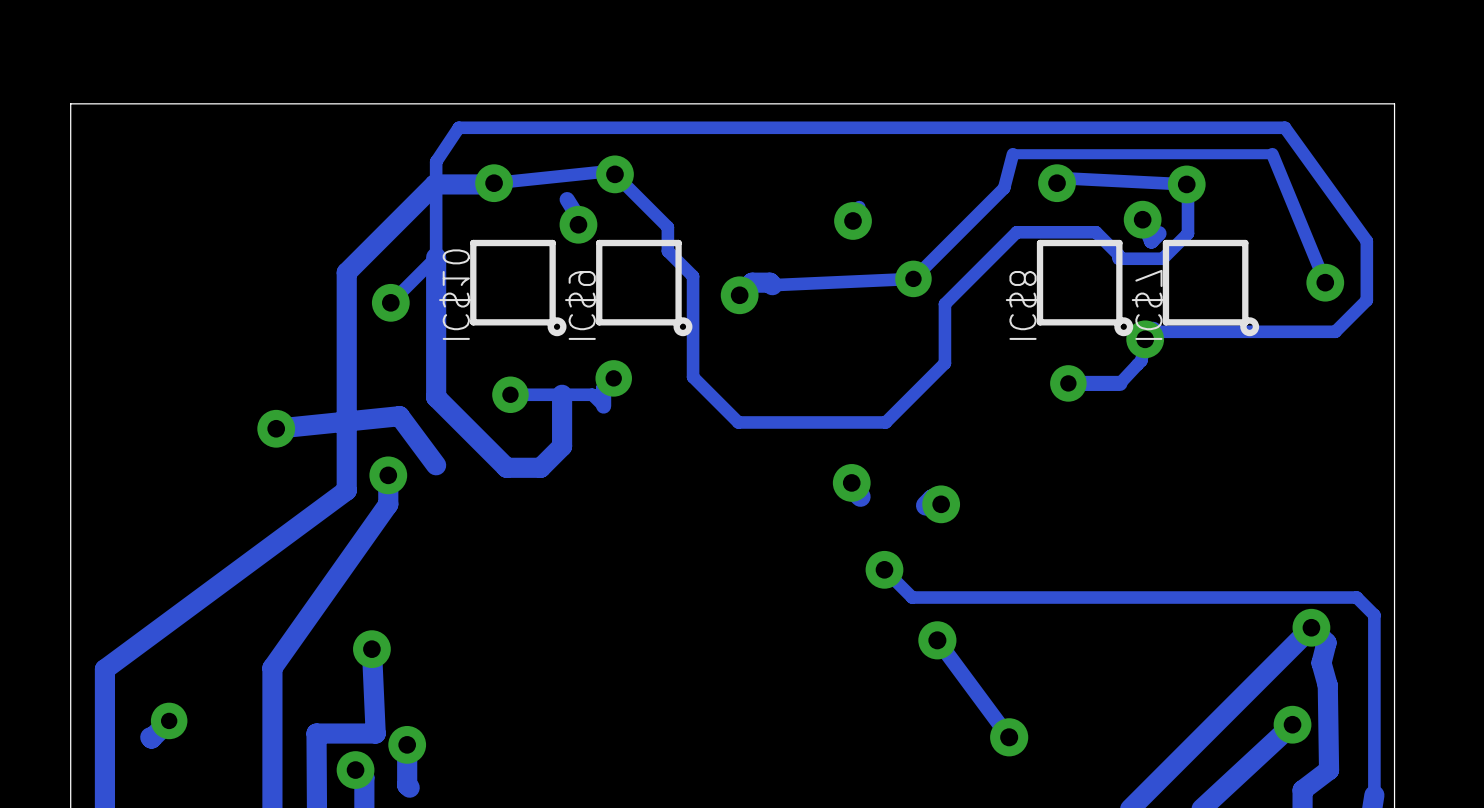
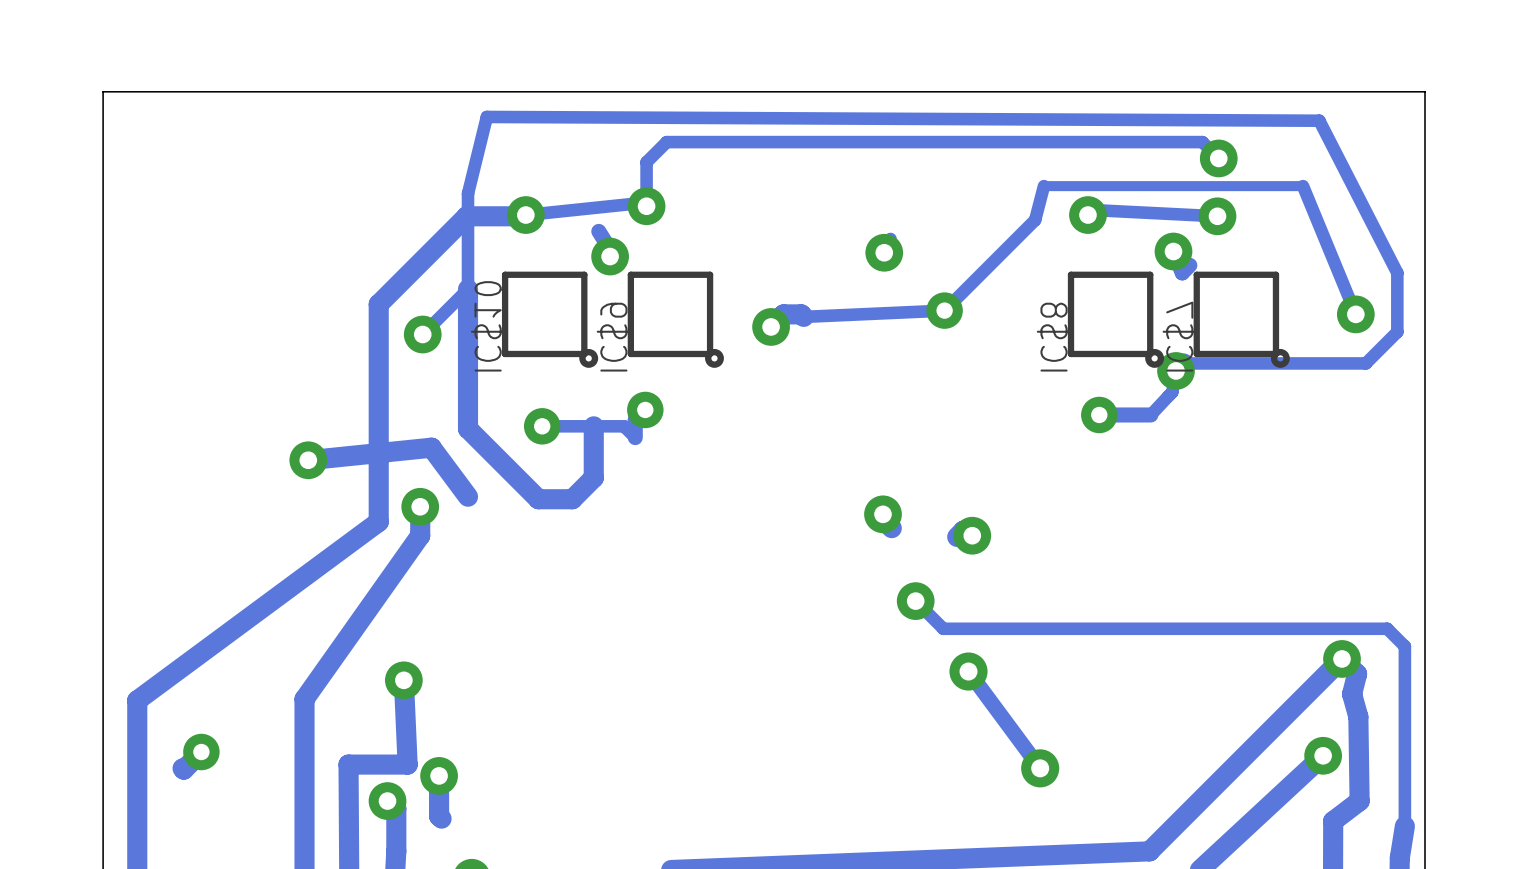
board edge: (1394, 103) (70, 103) -> (1425, 135) (1425, 91) (103, 91) (103, 135)
track: none -> (1218, 158) (1202, 142) (666, 142) (646, 162) (646, 202)
via: none -> (1218, 158)
track: (436, 161) (458, 127) (1284, 127) (1366, 241) -> (468, 193) (486, 116) (1319, 120) (1397, 272)
track: (614, 174) (667, 227) (667, 251) (693, 276) (693, 377) (738, 422) (885, 422) (944, 363) (944, 304) (1016, 232) (1096, 232) (1118, 254) (1118, 258) (1162, 258) (1188, 233) (1186, 184) -> none

